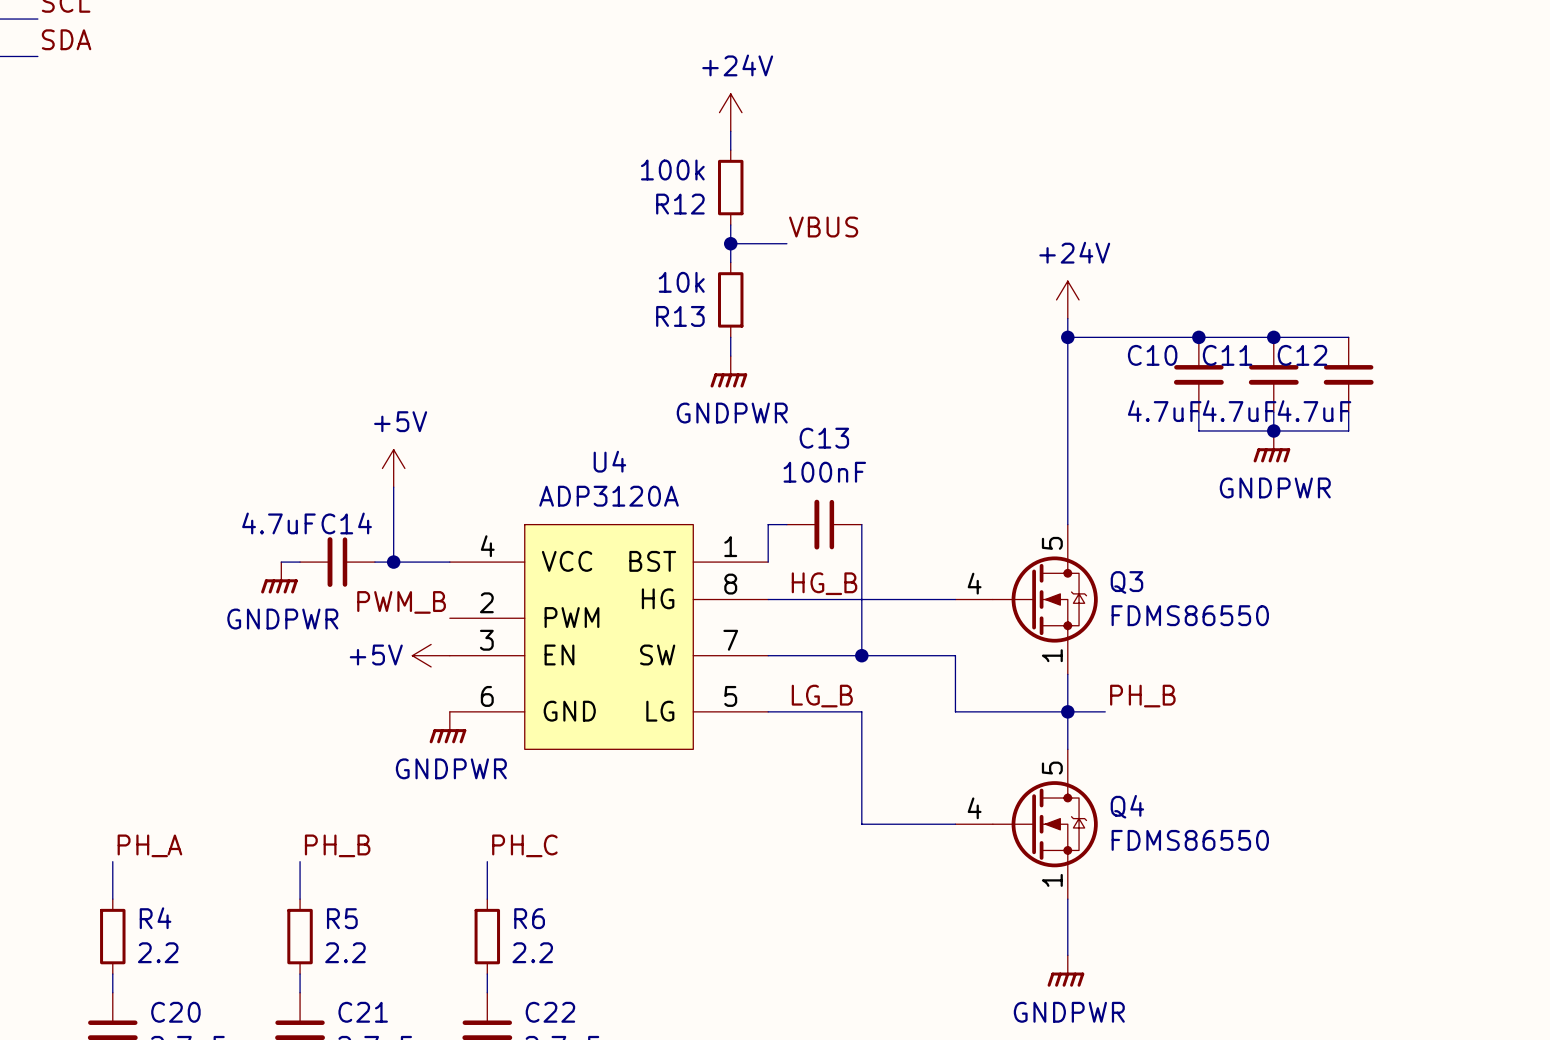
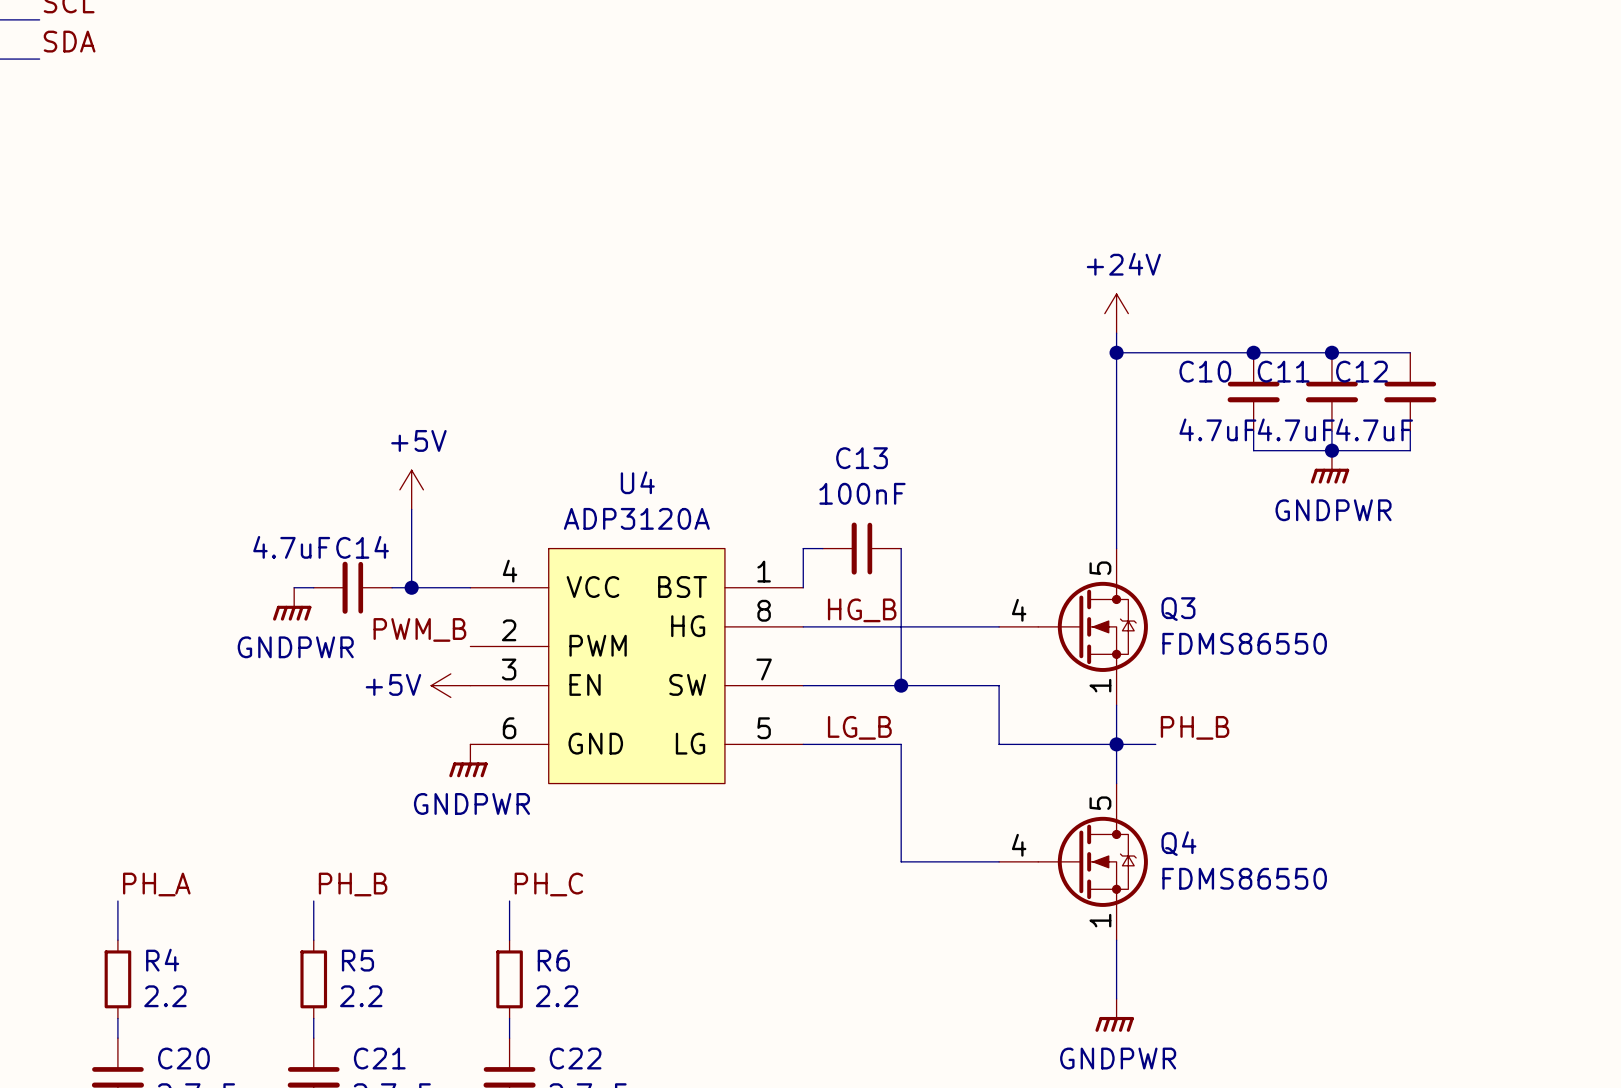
power symbol: +24V (730, 112) -> none
wire: (730, 131) (730, 150) -> none
R12: 100k (730, 187) -> none
wire: (730, 225) (730, 262) -> none
label: VBUS (823, 227) -> none
wire: (730, 243) (786, 243) -> none
junction: (730, 243) -> none
R13: 10k (730, 299) -> none
wire: (730, 337) (730, 356) -> none
power symbol: GNDPWR (728, 371) -> none

